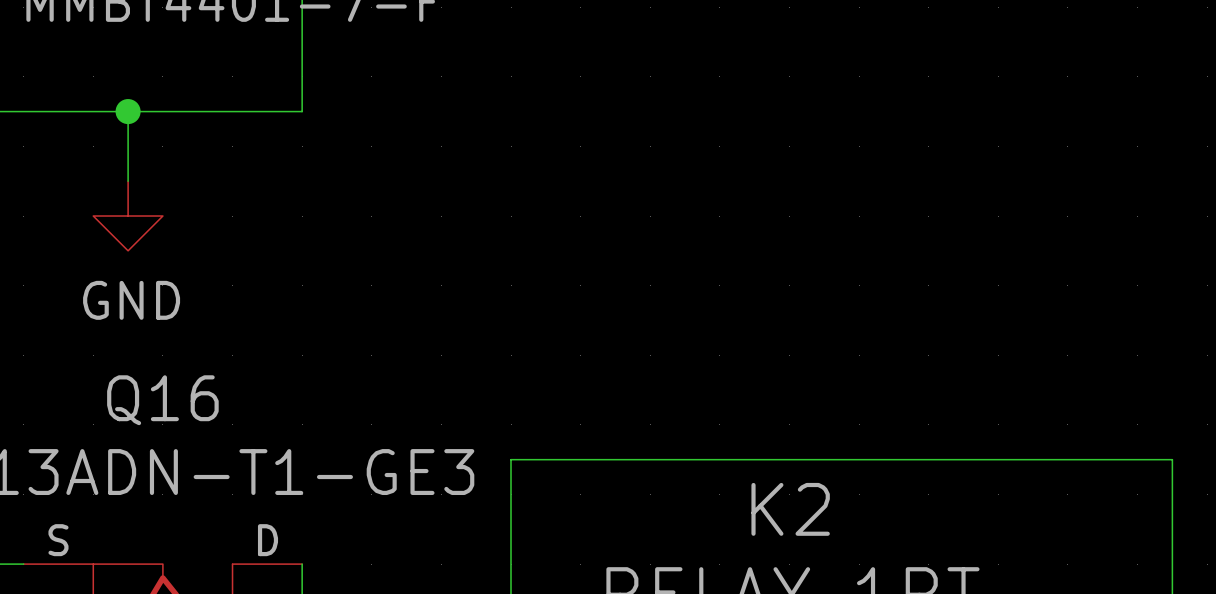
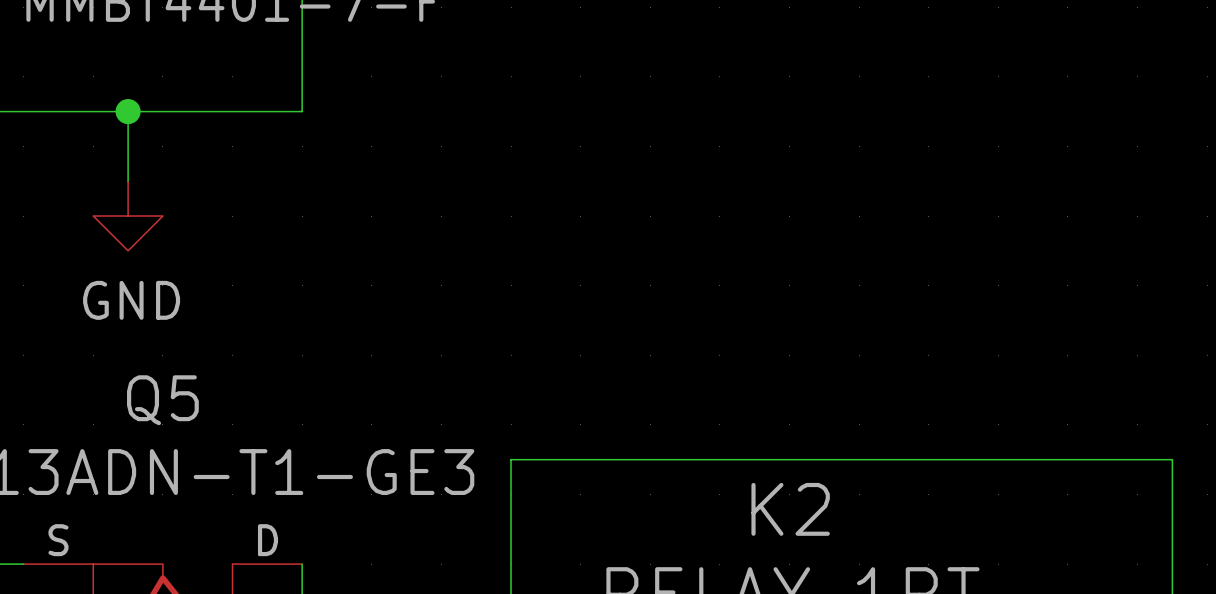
Q16 name: Q16 (162, 400) -> Q5 (162, 400)

